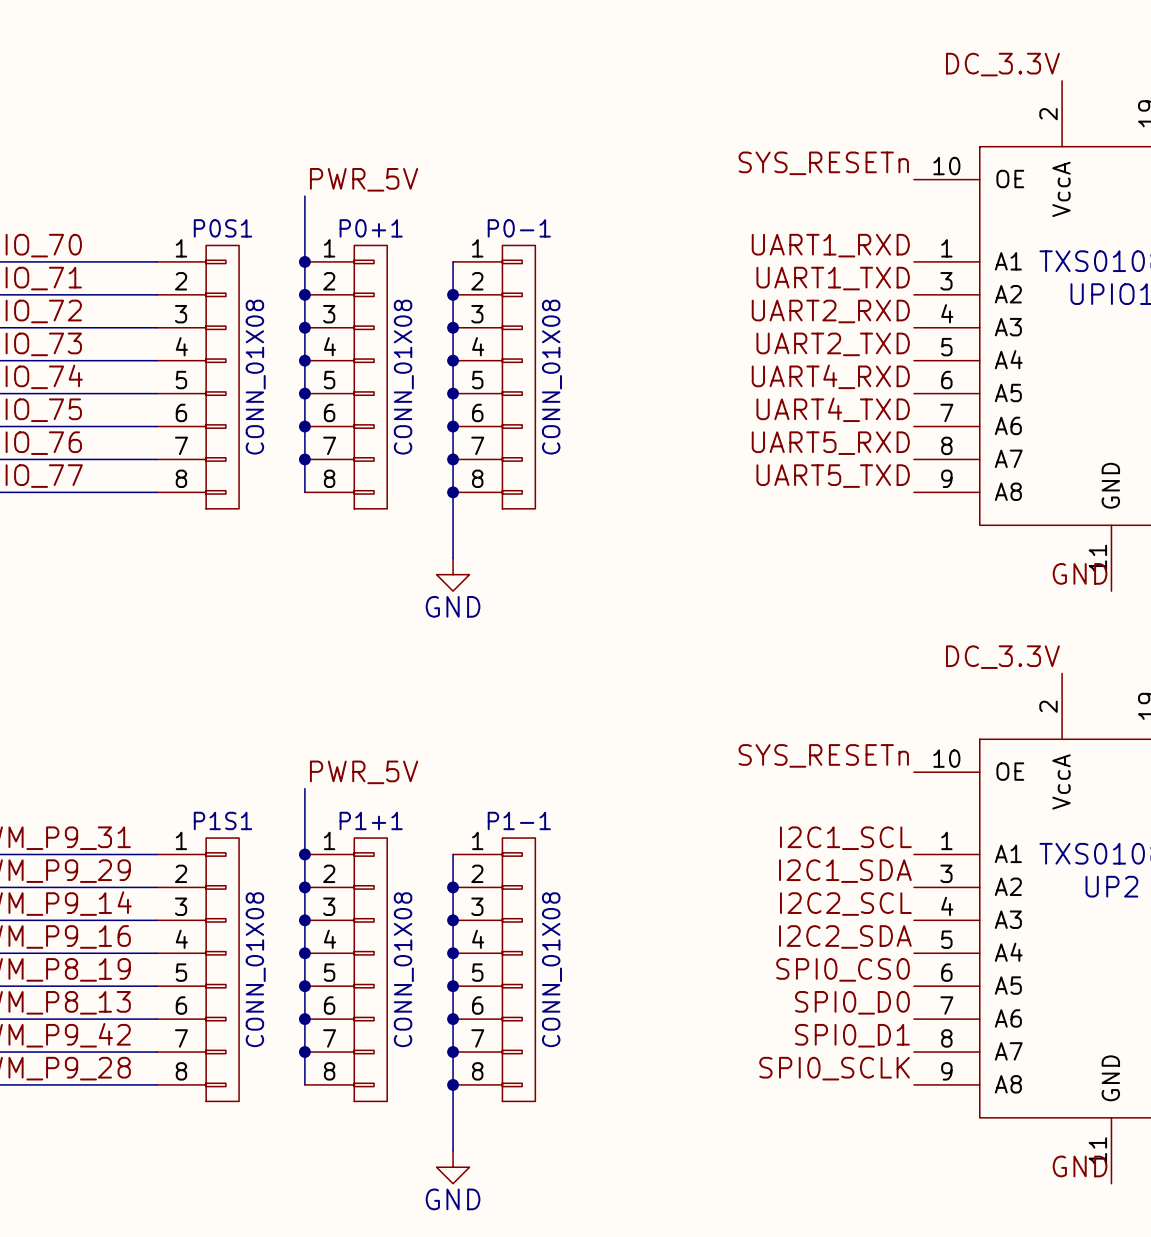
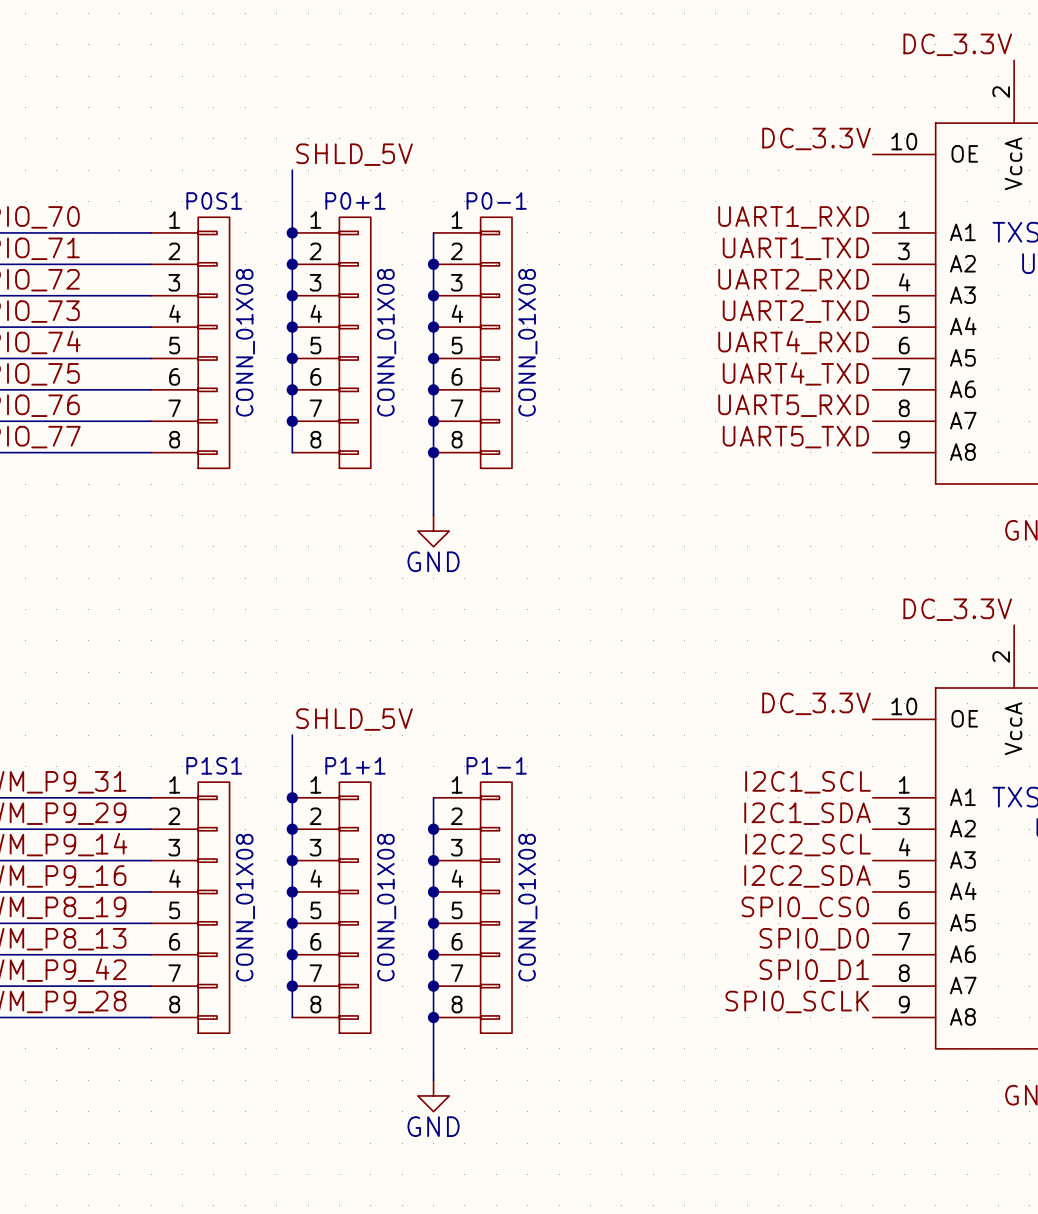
label: SYS_RESETn (823, 163) -> DC_3.3V (816, 138)
label: PWR_5V (364, 179) -> SHLD_5V (354, 154)
label: SYS_RESETn (823, 755) -> DC_3.3V (816, 703)
label: PWR_5V (364, 772) -> SHLD_5V (354, 719)

